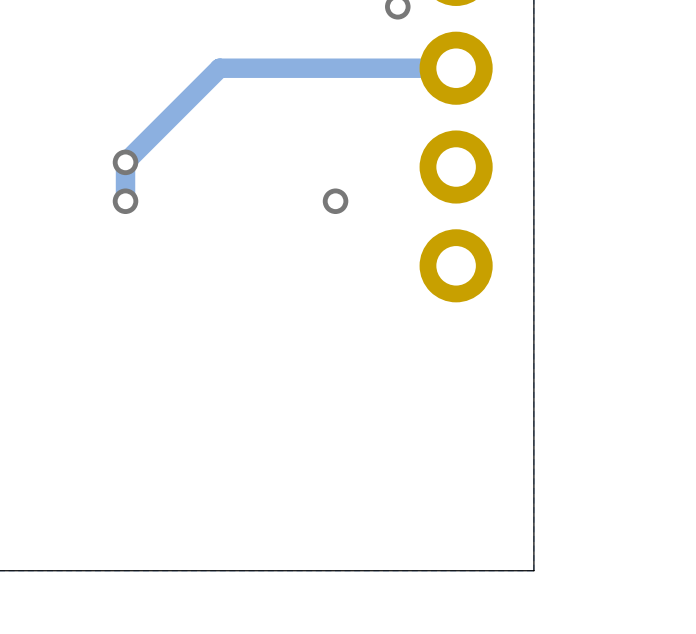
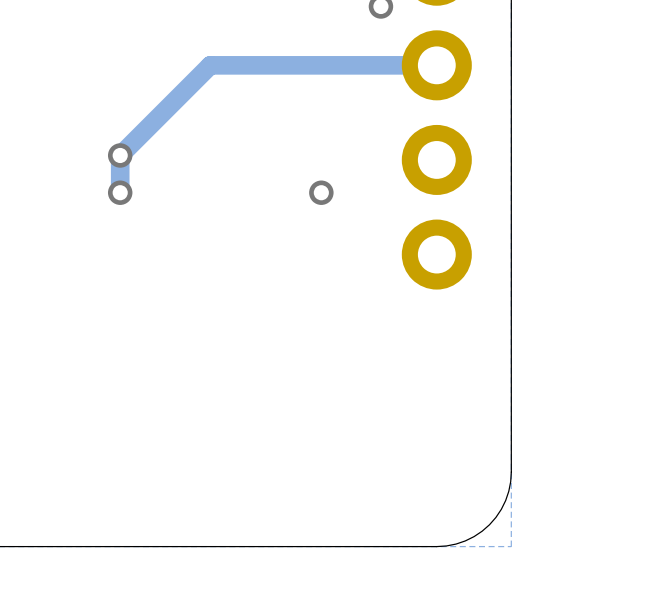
board edge: (533, 492) (533, 570) (456, 570) -> (511, 472) (505, 500) (489, 524) (465, 540) (436, 546)

